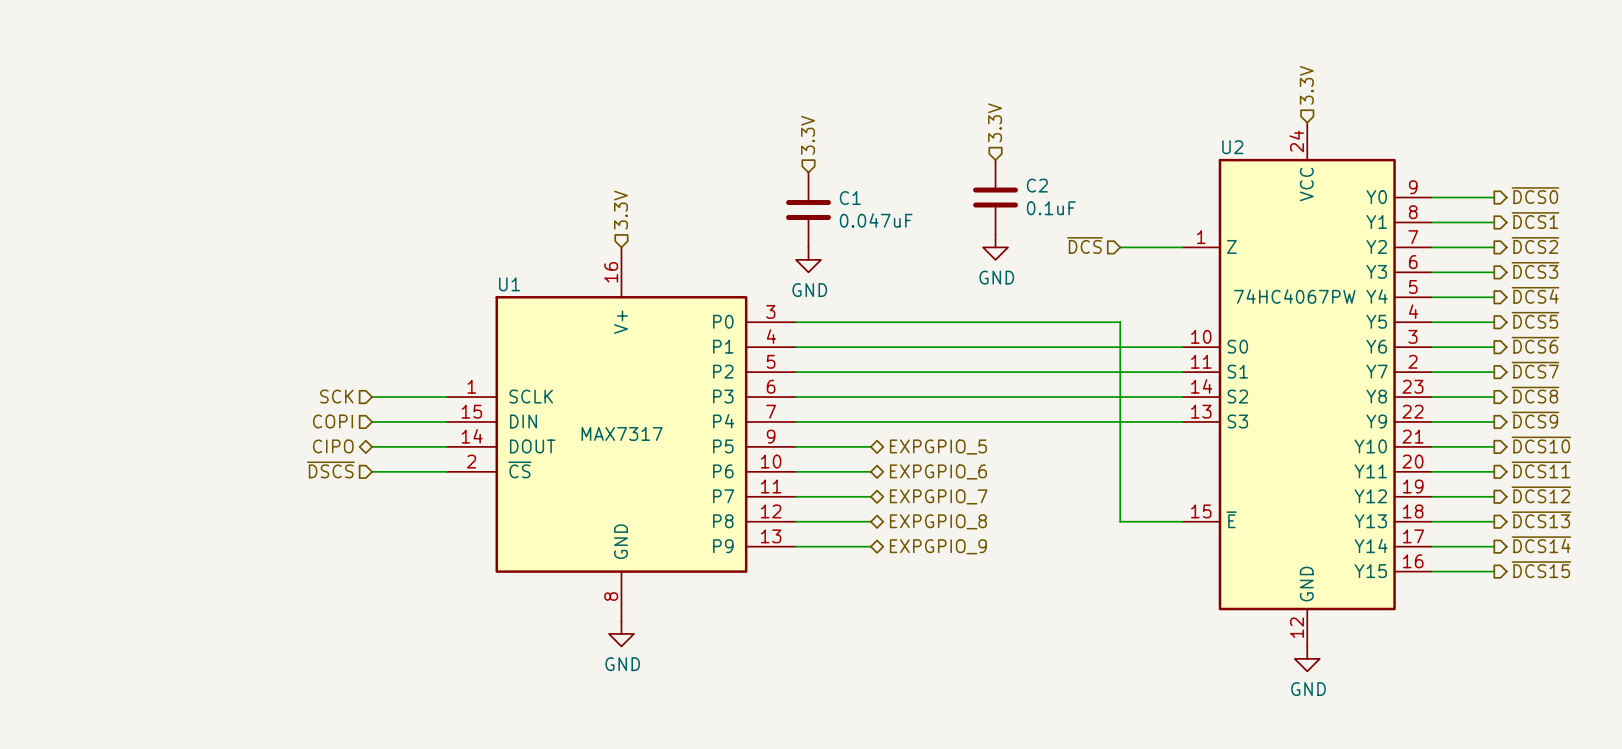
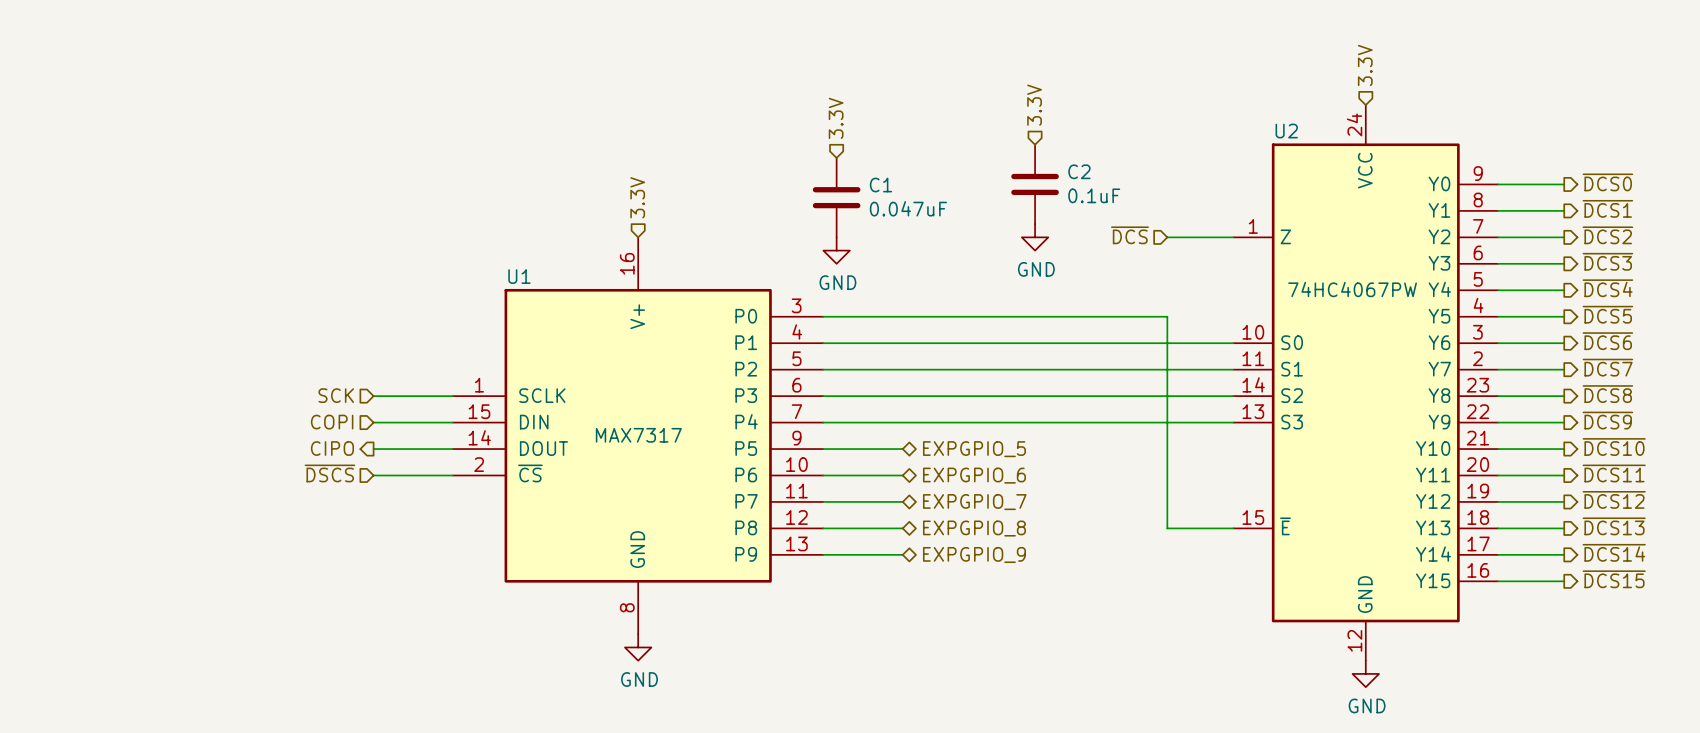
hierarchical label shape: bidirectional (333, 446) -> output (332, 448)

